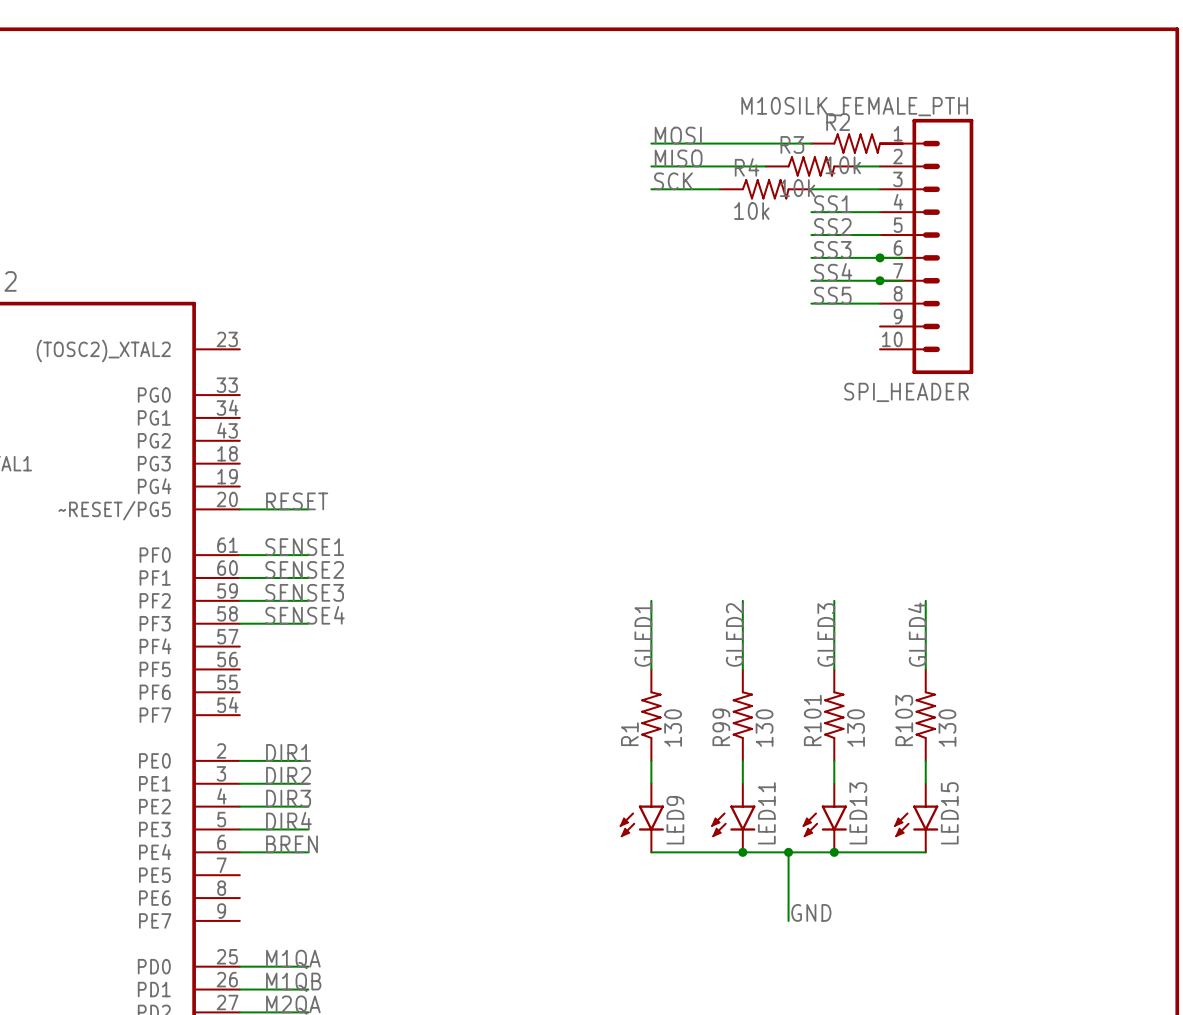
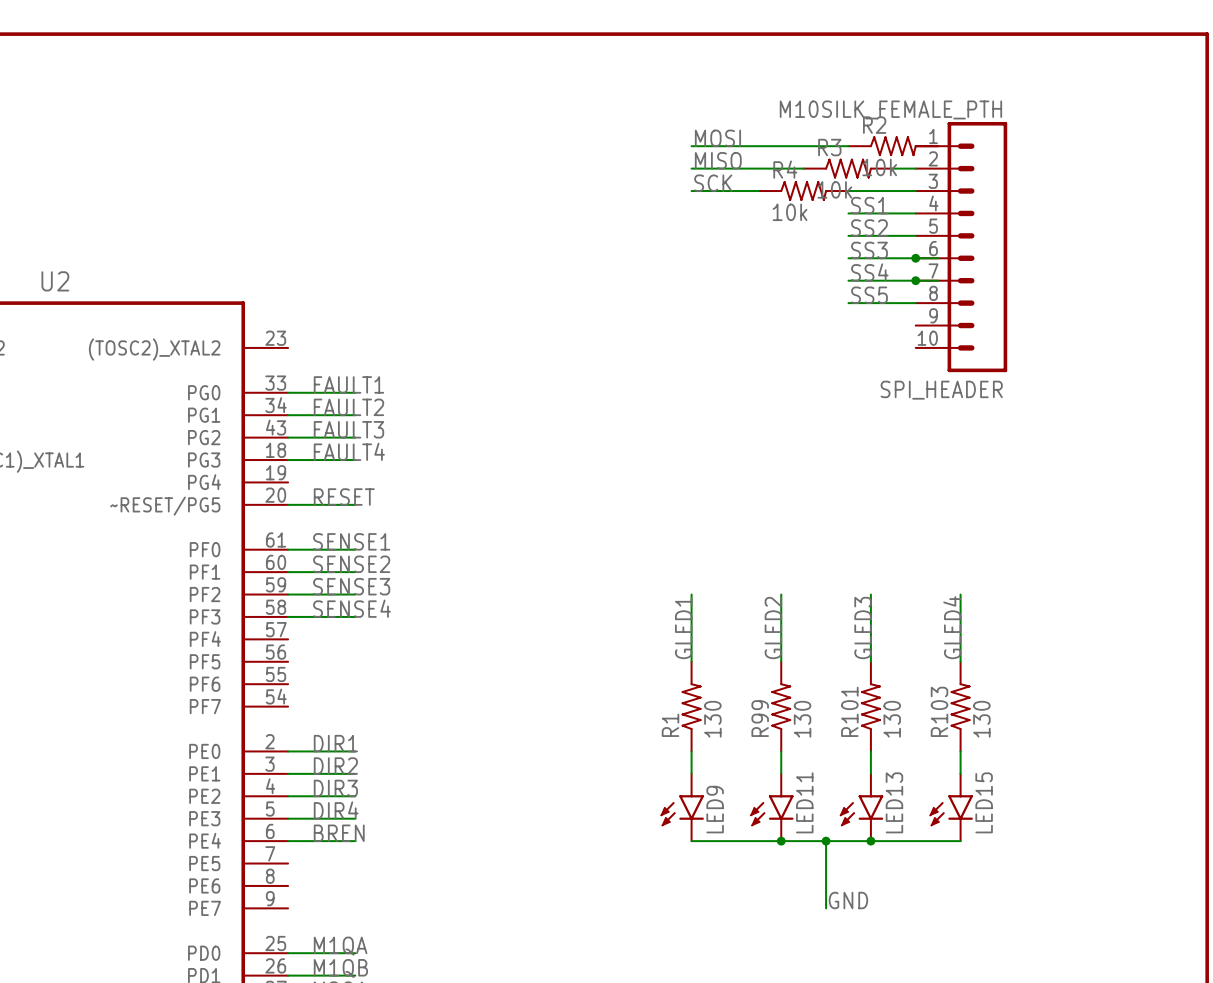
label: none -> FAULT1 (348, 384)
wire: none -> (288, 392) (355, 392)
label: none -> FAULT2 (348, 407)
wire: none -> (288, 415) (355, 415)
label: none -> FAULT3 (348, 429)
wire: none -> (288, 437) (355, 437)
label: none -> FAULT4 (349, 451)
wire: none -> (288, 460) (355, 460)

